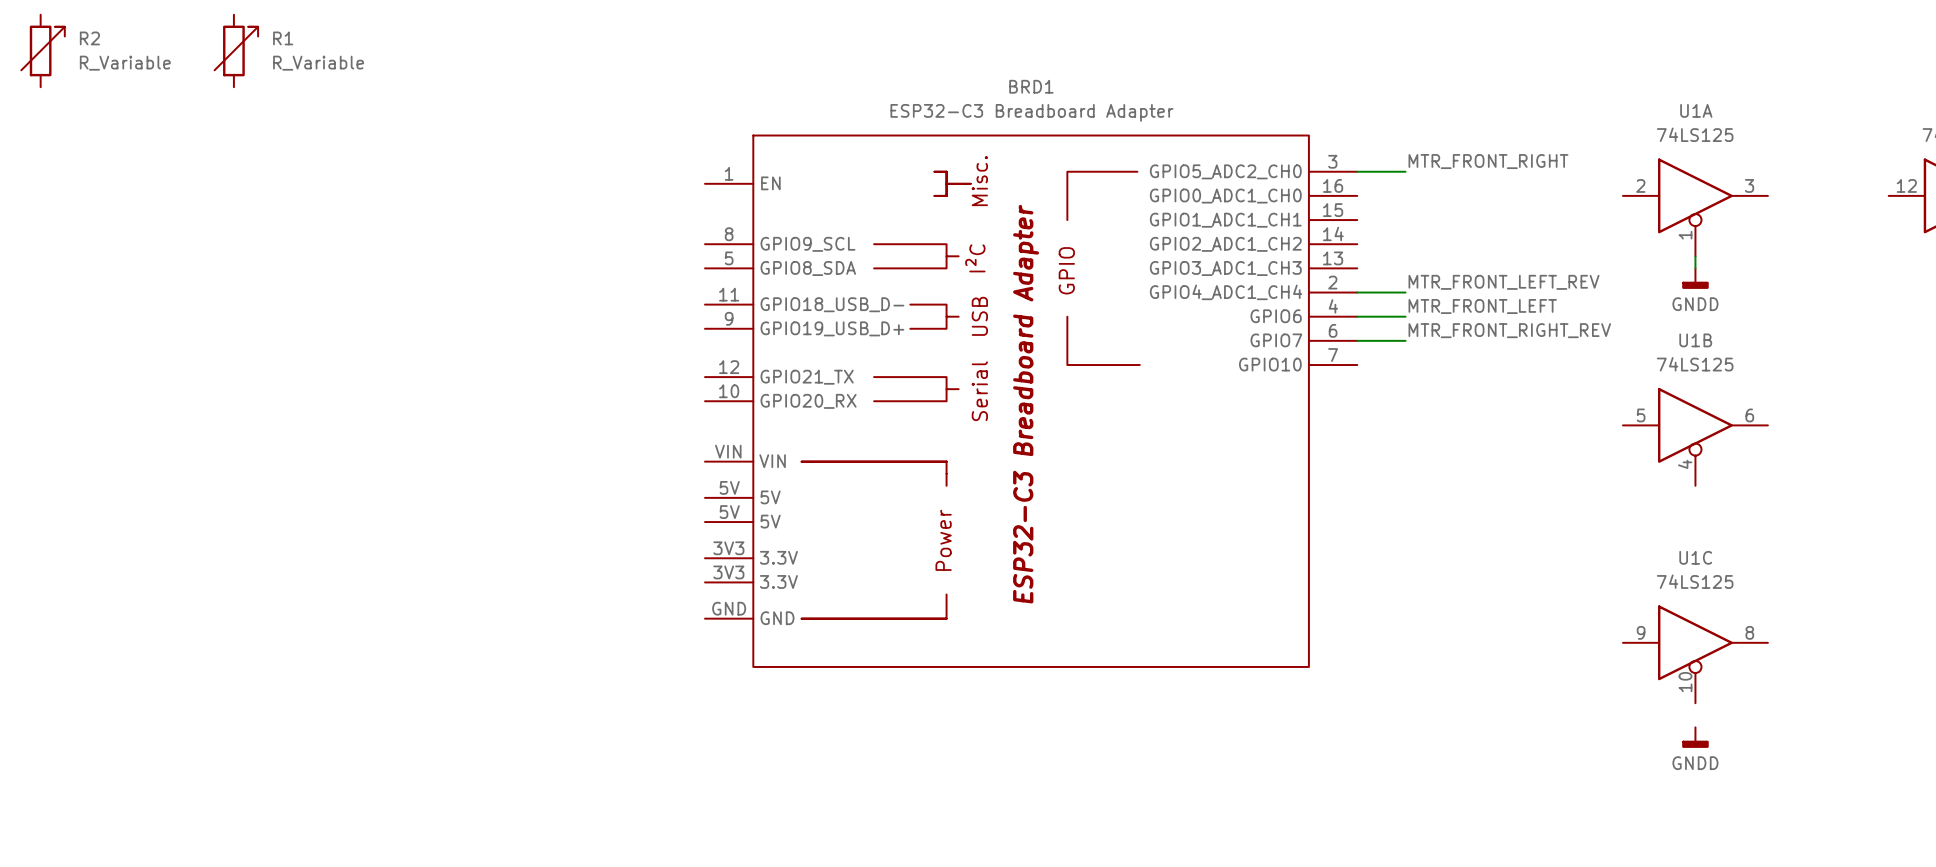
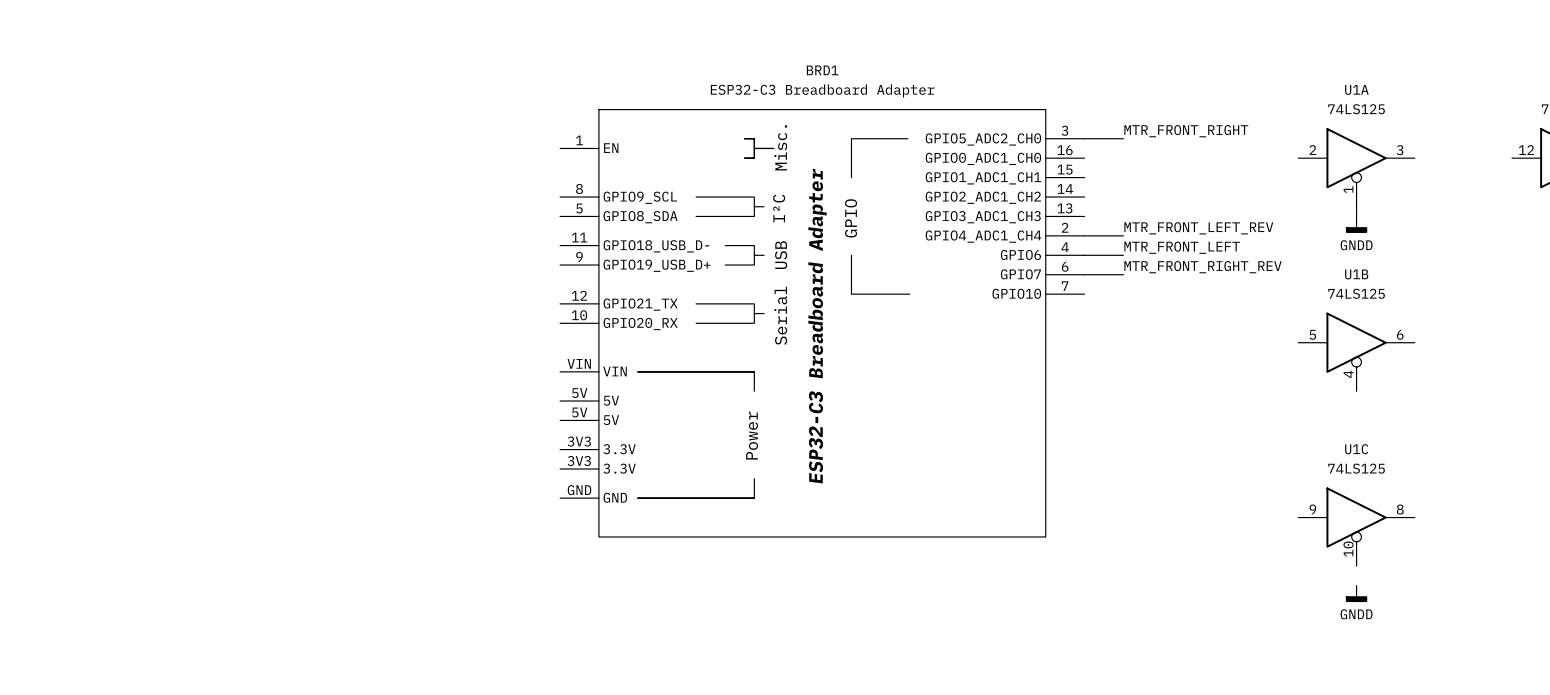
R2: R_Variable (43, 50) -> none
R1: R_Variable (236, 50) -> none

